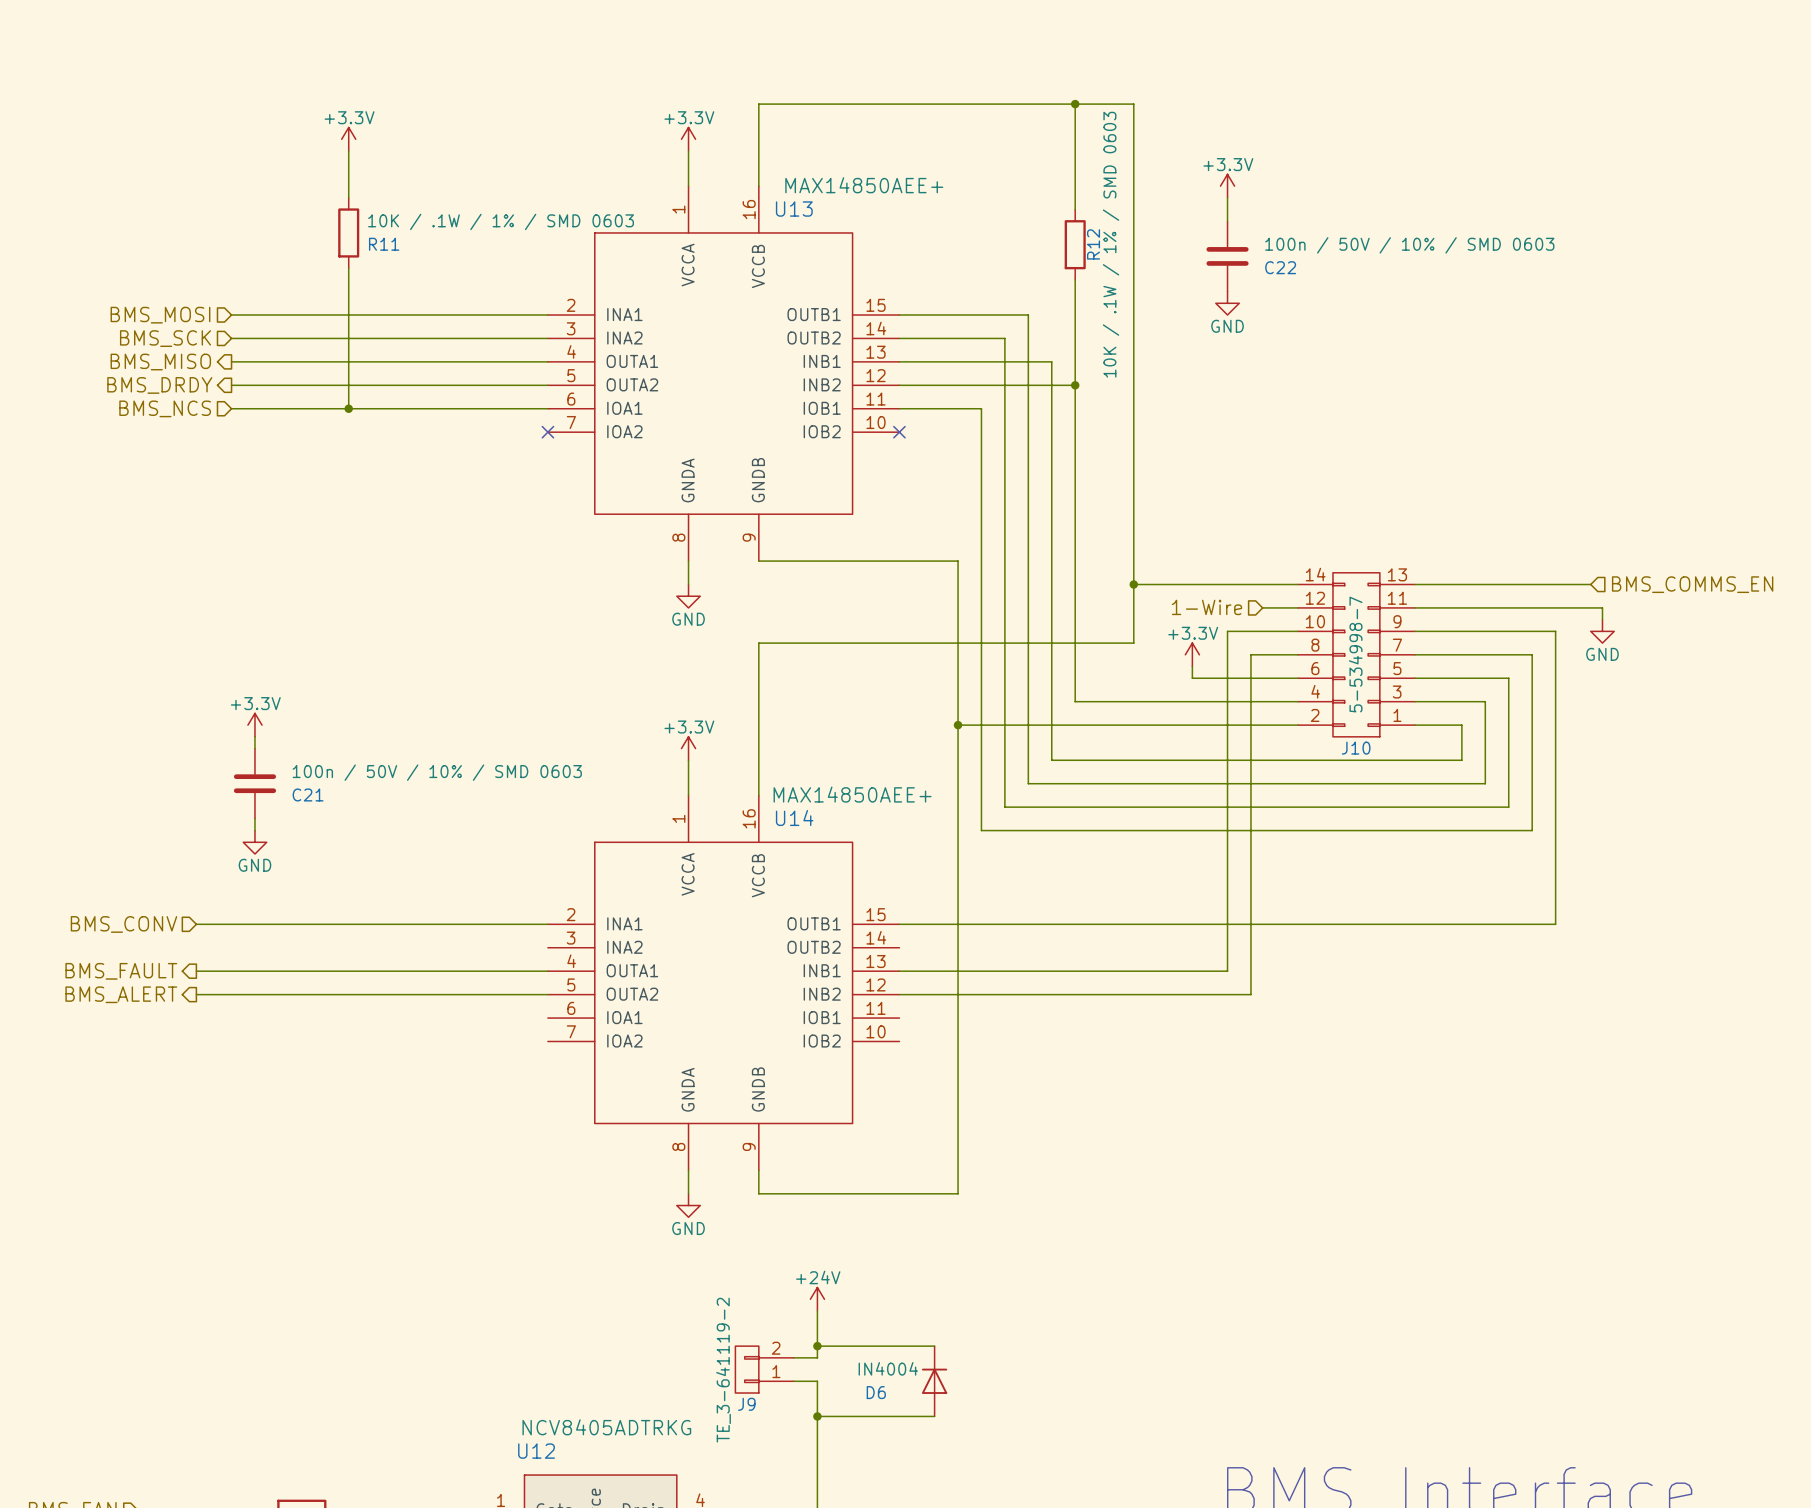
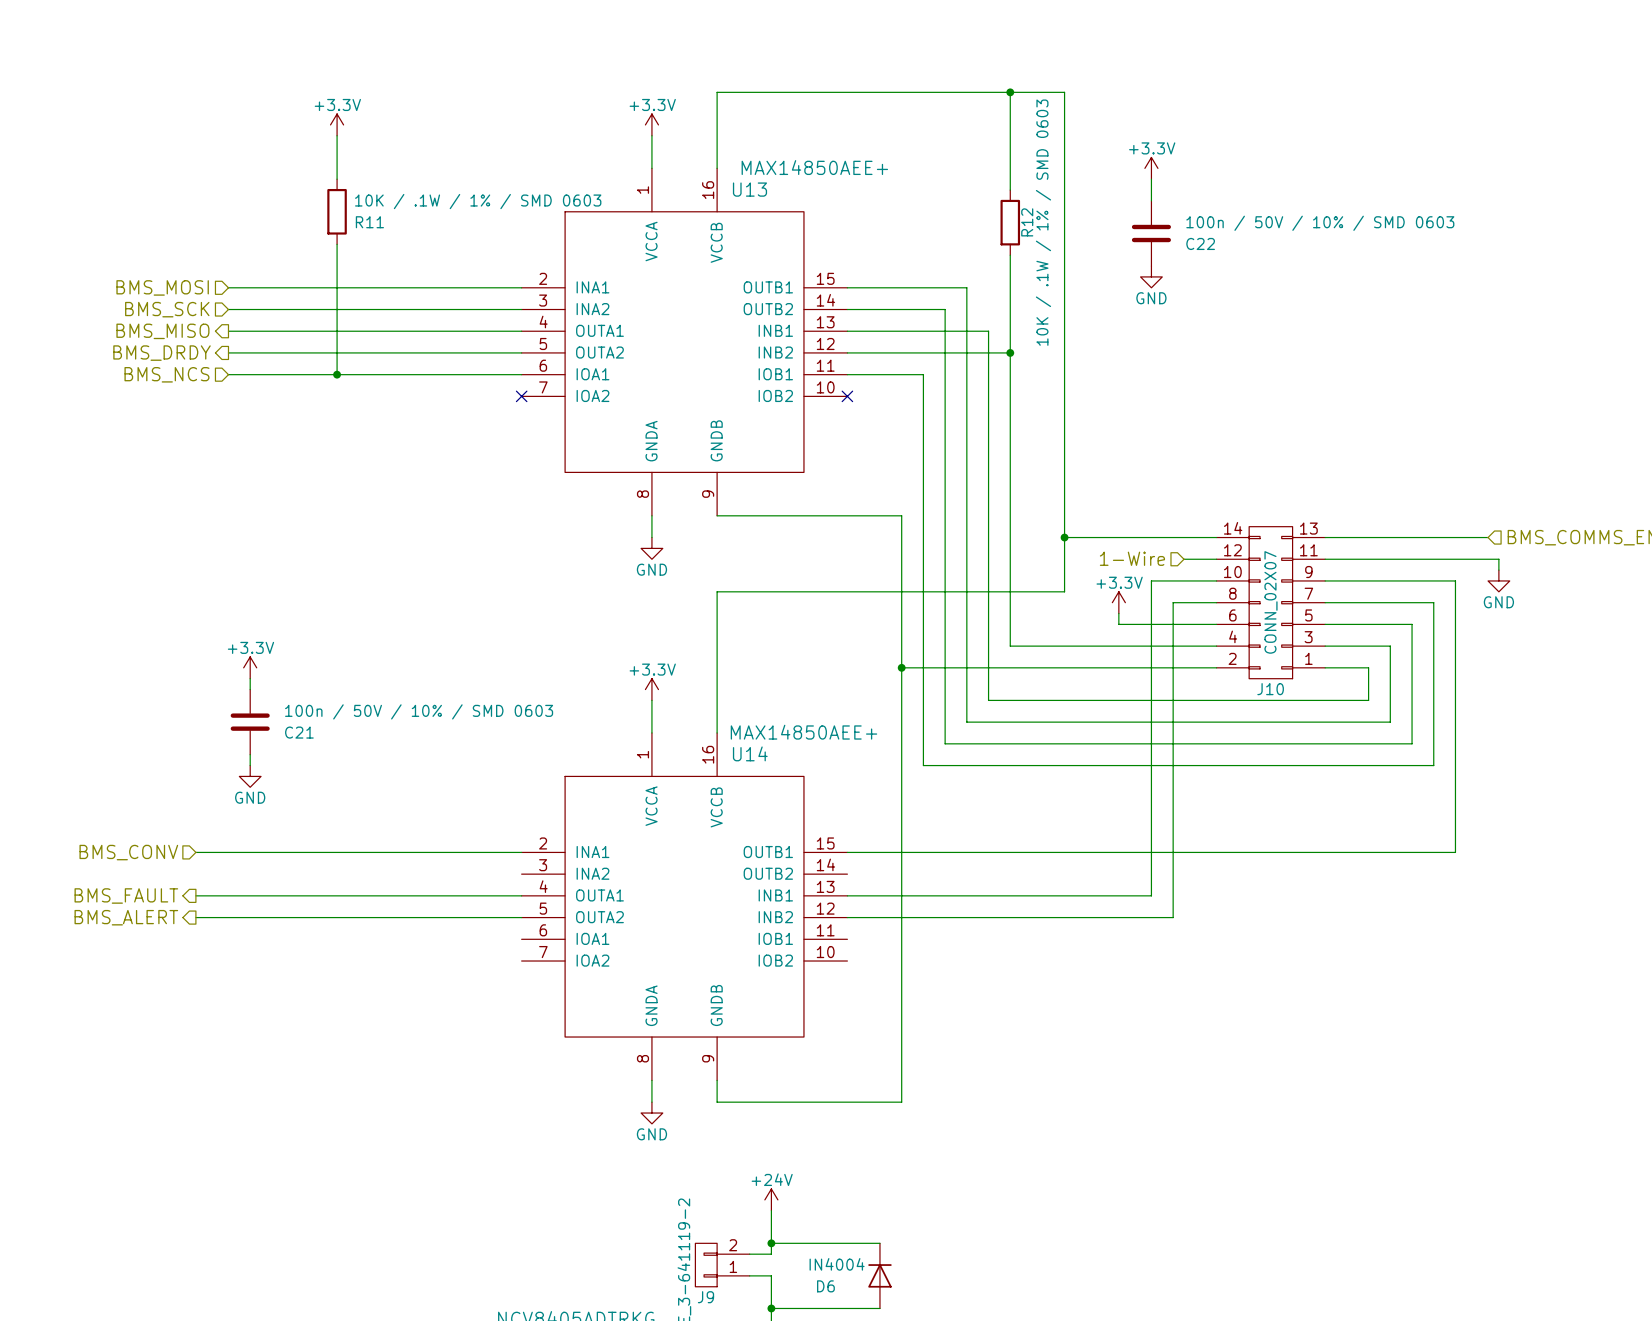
J10 value: 5-534998-7 (1355, 654) -> CONN_02X07 (1270, 602)

